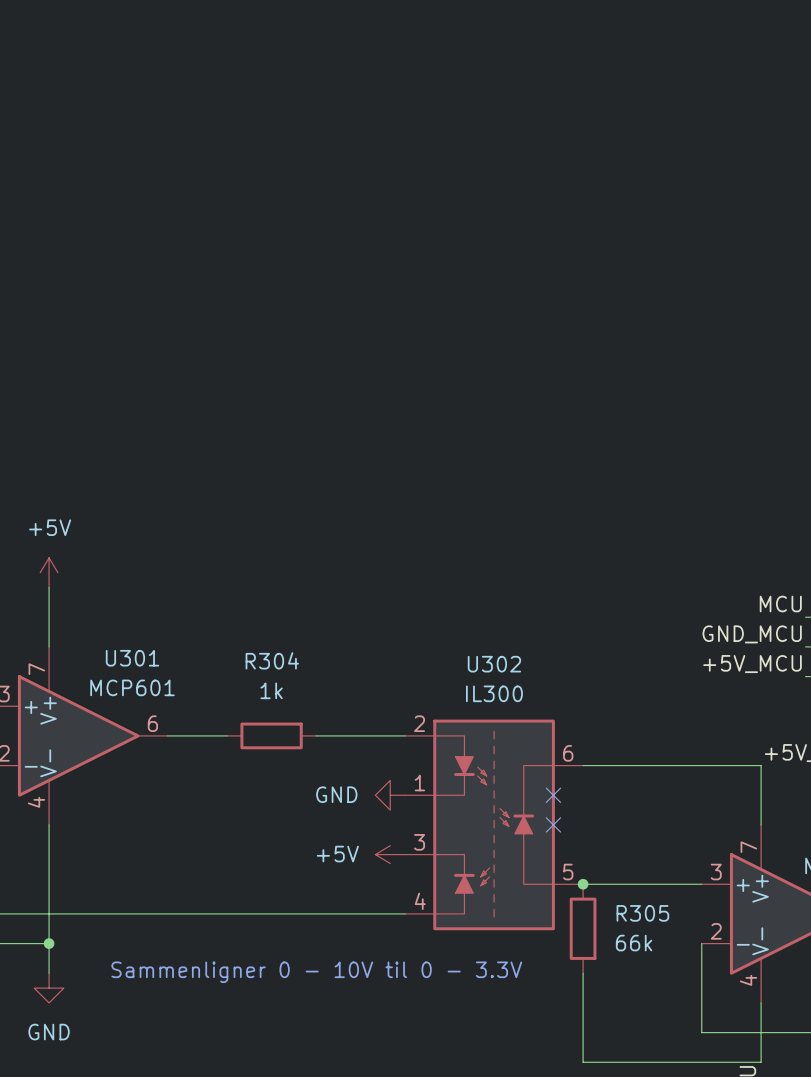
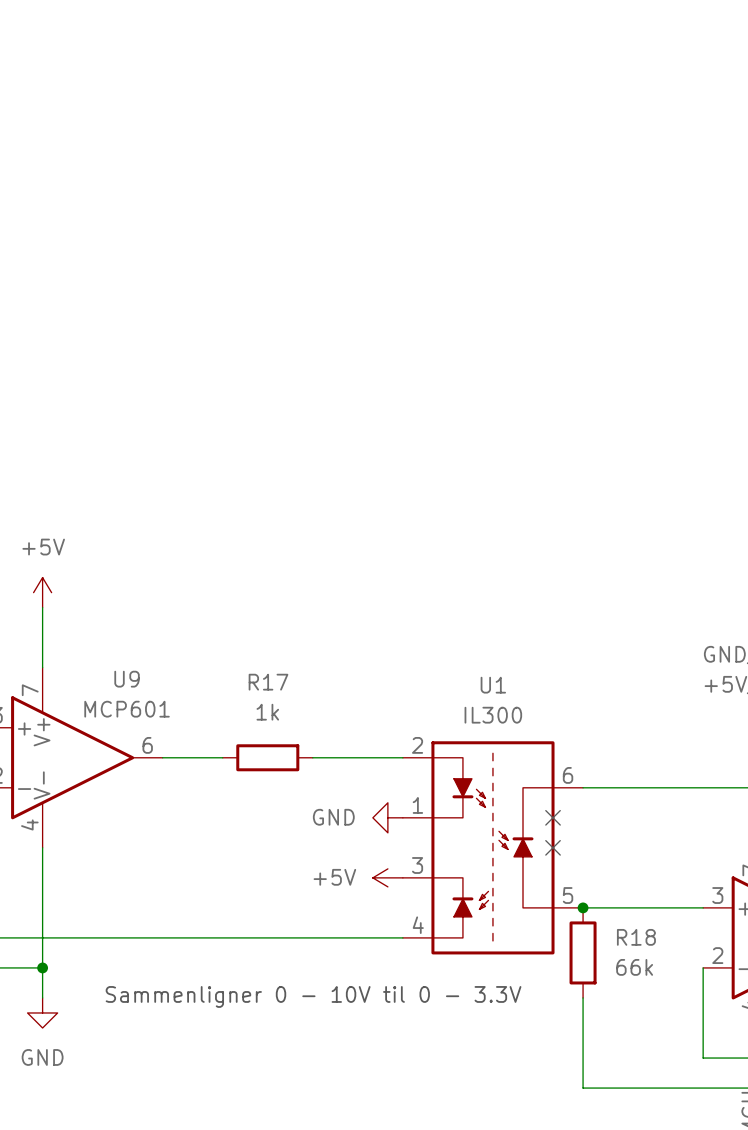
U301 name: U301 (132, 658) -> U9 (127, 679)
R304 name: R304 (272, 660) -> R17 (268, 682)
U302 name: U302 (494, 664) -> U1 (493, 685)
R305 name: R305 (642, 913) -> R18 (636, 937)

